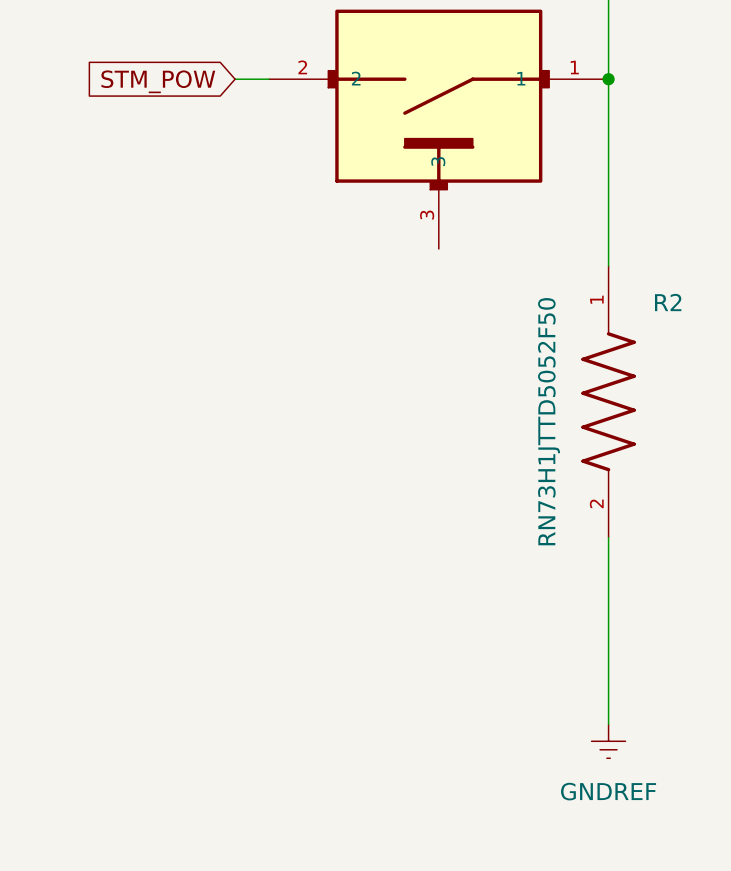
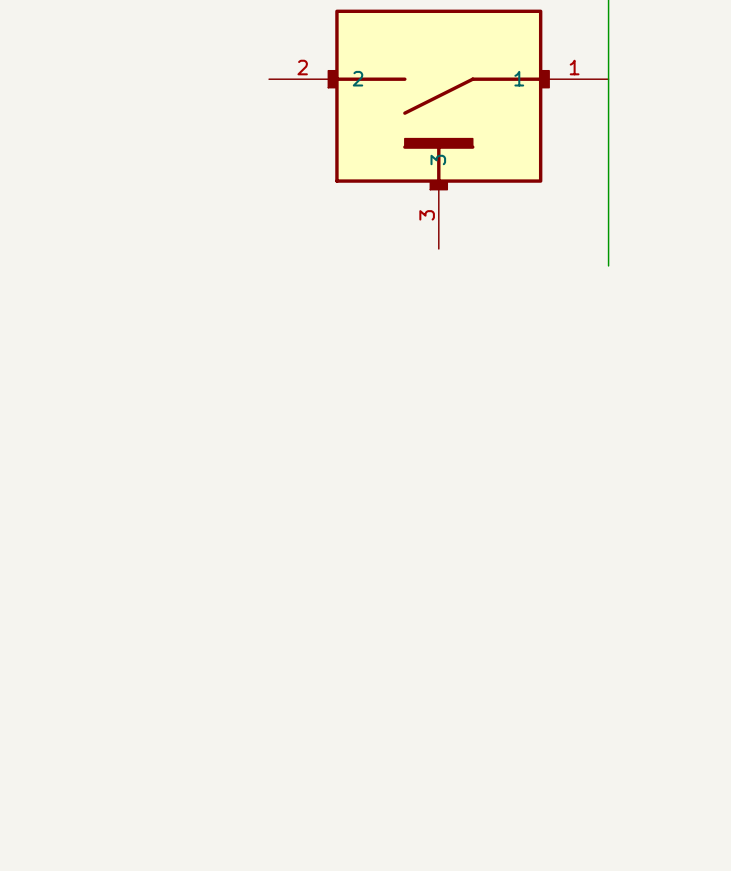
wire: (235, 79) (269, 79) -> none
junction: (608, 79) -> none
global label: STM_POW (158, 81) -> none
R2: RN73H1JTTD5052F50 (608, 401) -> none
wire: (608, 537) (608, 724) -> none
power symbol: GNDREF (608, 741) -> none

